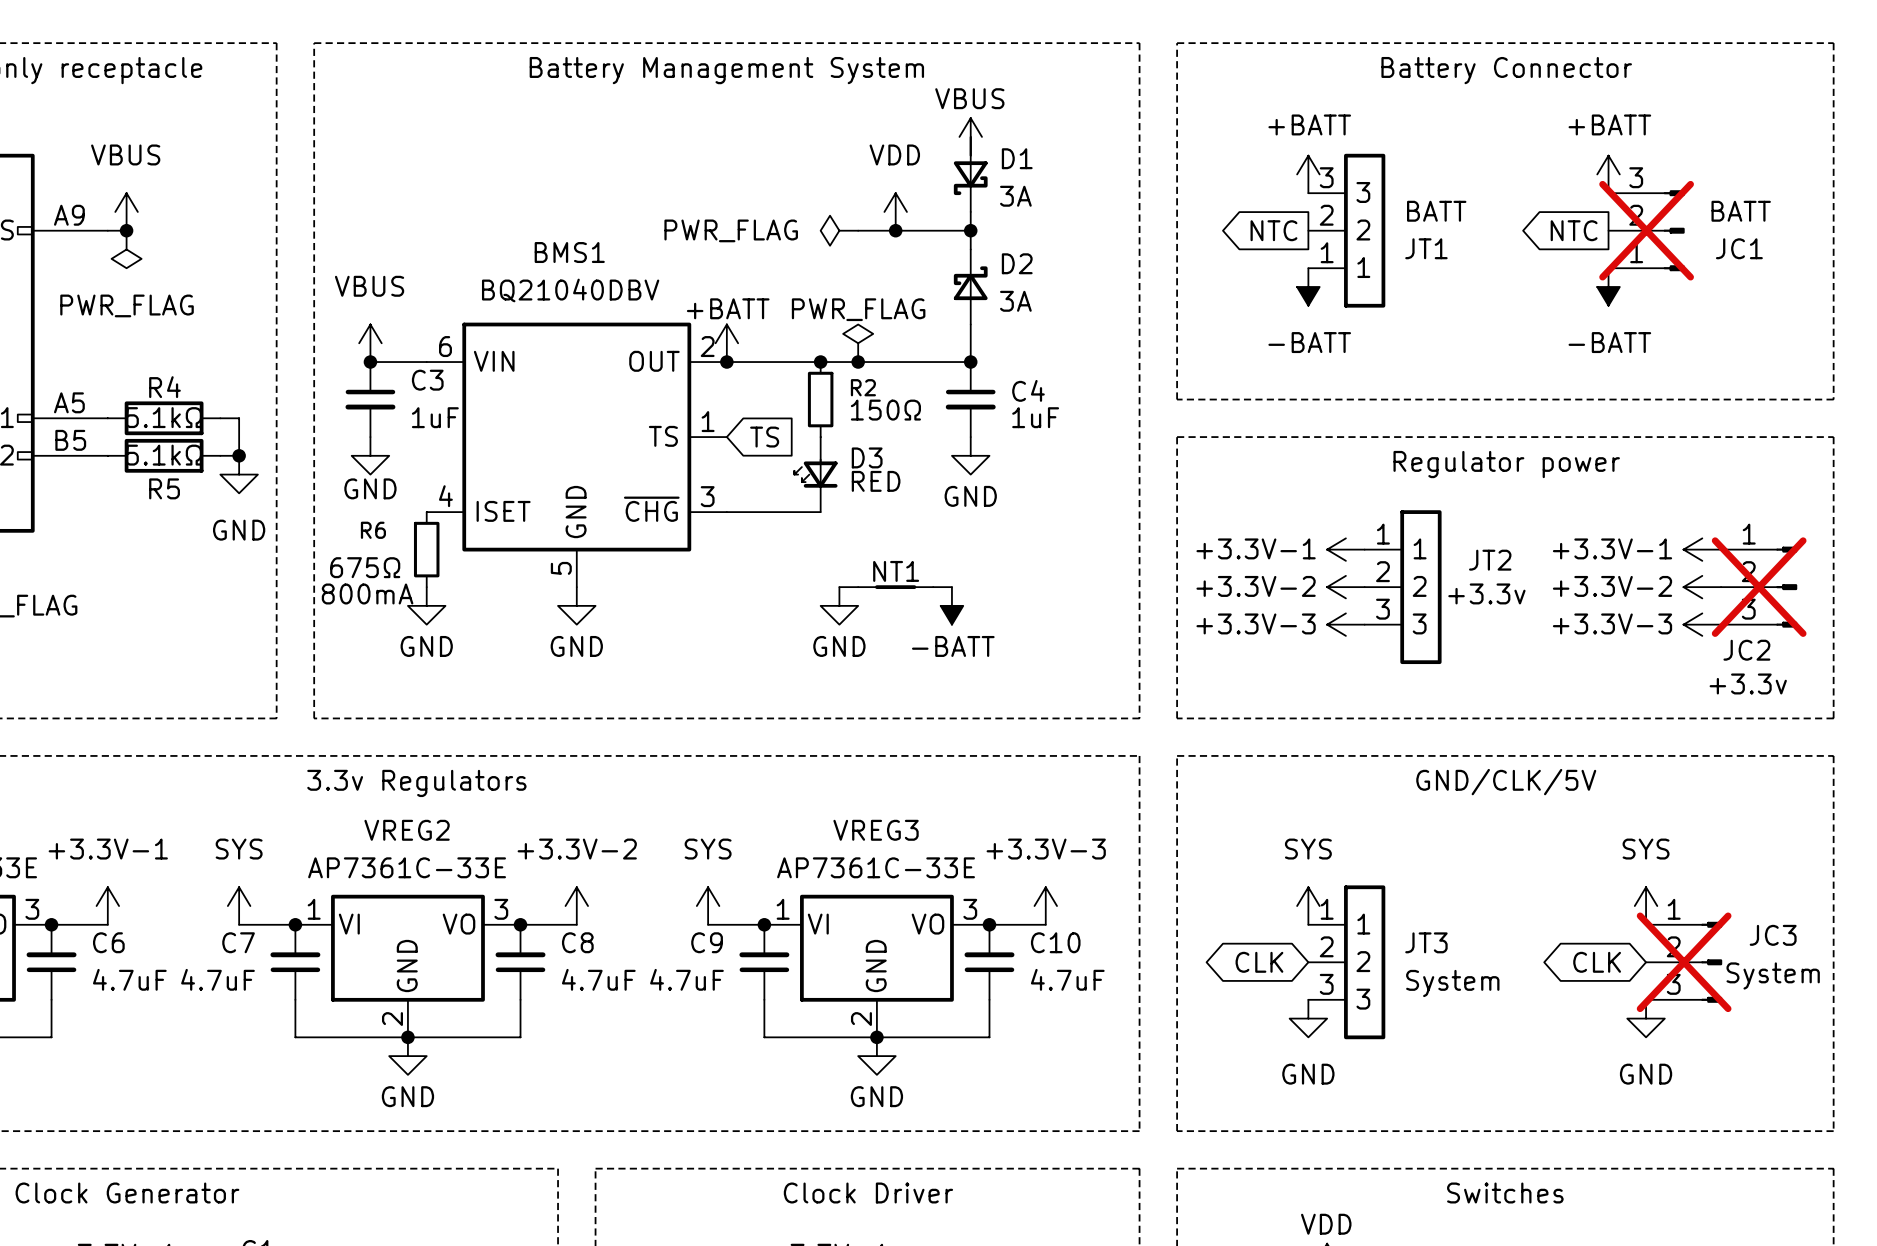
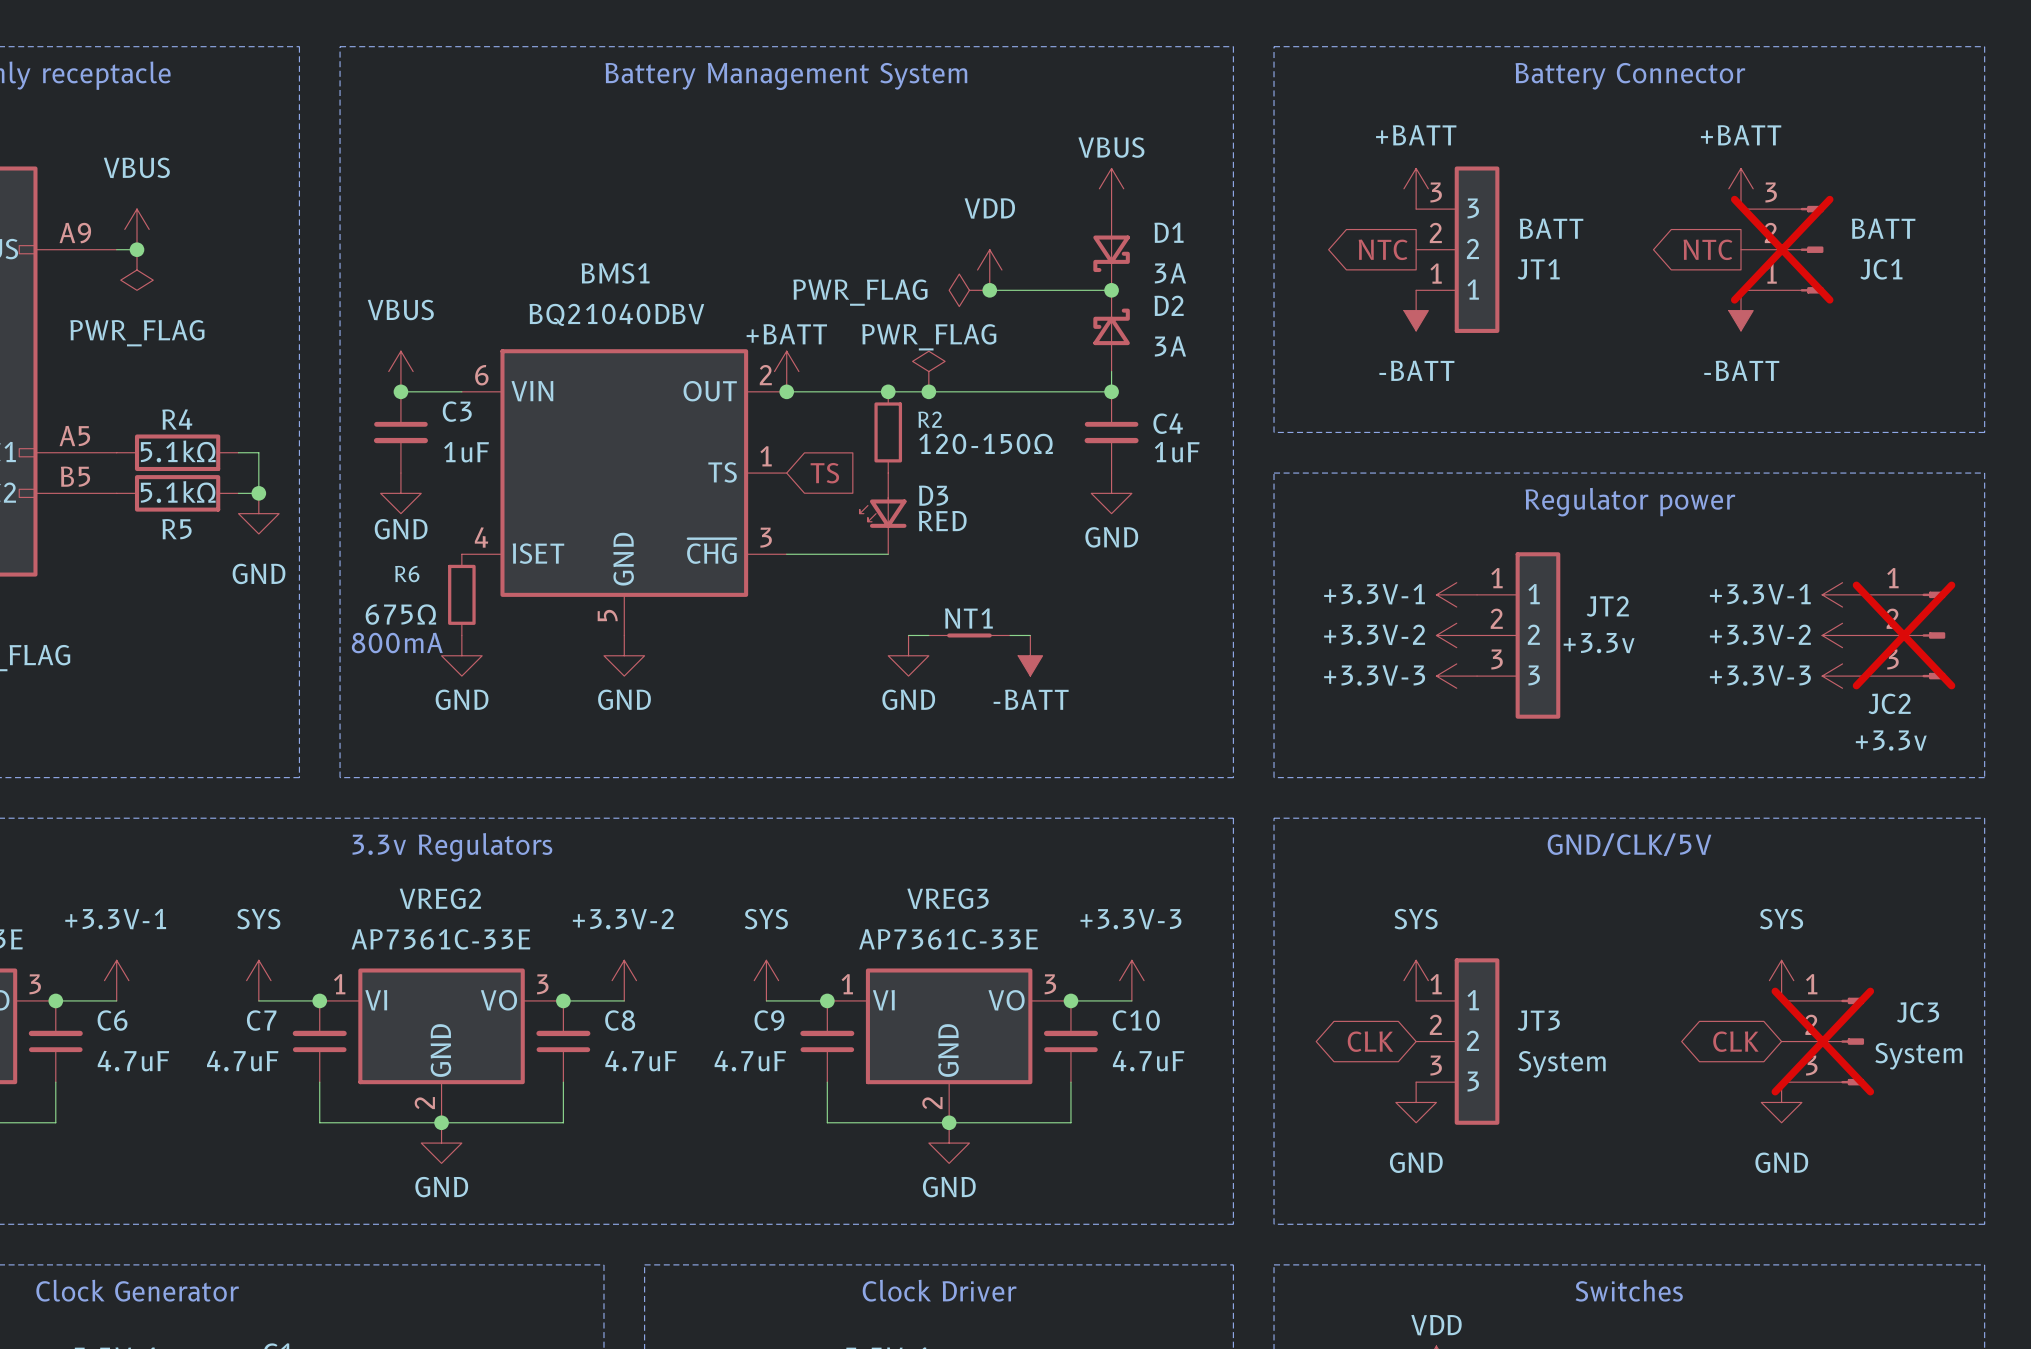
power symbol position: VBUS (970, 136) -> VBUS (1111, 188)
D1 name position: D1 (1017, 158) -> D1 (1169, 232)
D1 position: (970, 174) -> (1111, 249)
D1 value position: 3A (1015, 196) -> 3A (1170, 273)
power symbol position: VDD (895, 211) -> VDD (989, 270)
wire: (970, 211) (970, 249) -> none
power symbol position: PWR_FLAG (839, 230) -> PWR_FLAG (969, 290)
wire: (858, 230) (970, 230) -> (989, 290) (1111, 290)
junction: (895, 230) -> none
junction: (970, 230) -> none
D2 name position: D2 (1017, 263) -> D2 (1169, 305)
junction: none -> (989, 290)
junction: none -> (1111, 290)
D2 position: (970, 286) -> (1111, 330)
D2 value position: 3A (1015, 301) -> 3A (1170, 346)
wire: (970, 324) (970, 362) -> (1111, 371) (1111, 391) (1050, 391)
junction: (970, 362) -> none
junction: none -> (1111, 391)
C4 position: (970, 399) -> (1111, 432)
R2 value: 150Ω (885, 410) -> 120-150Ω (986, 443)
power symbol position: GND (970, 455) -> GND (1111, 493)

